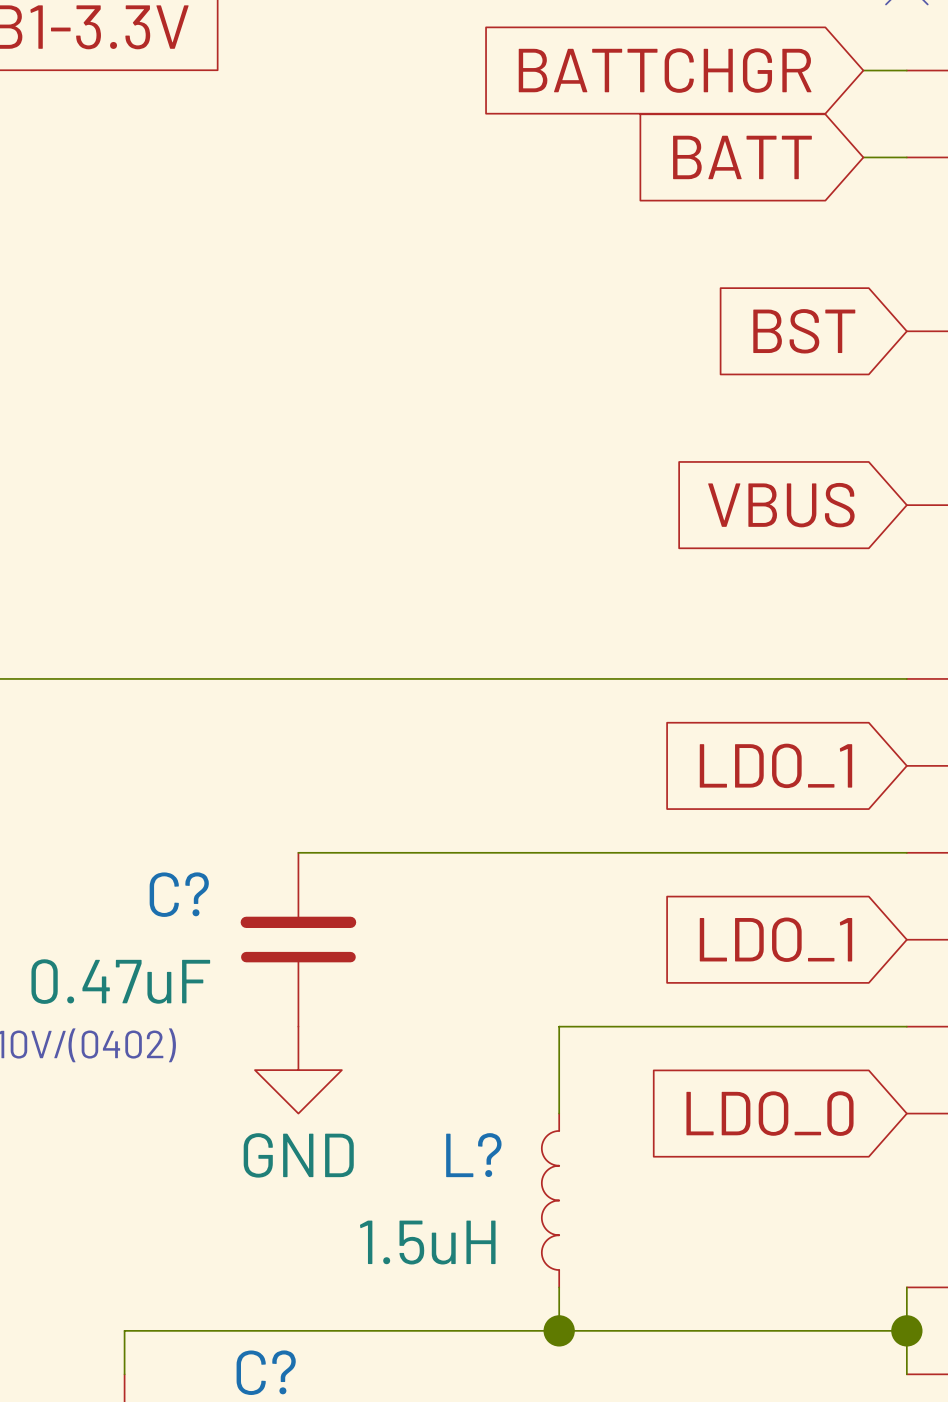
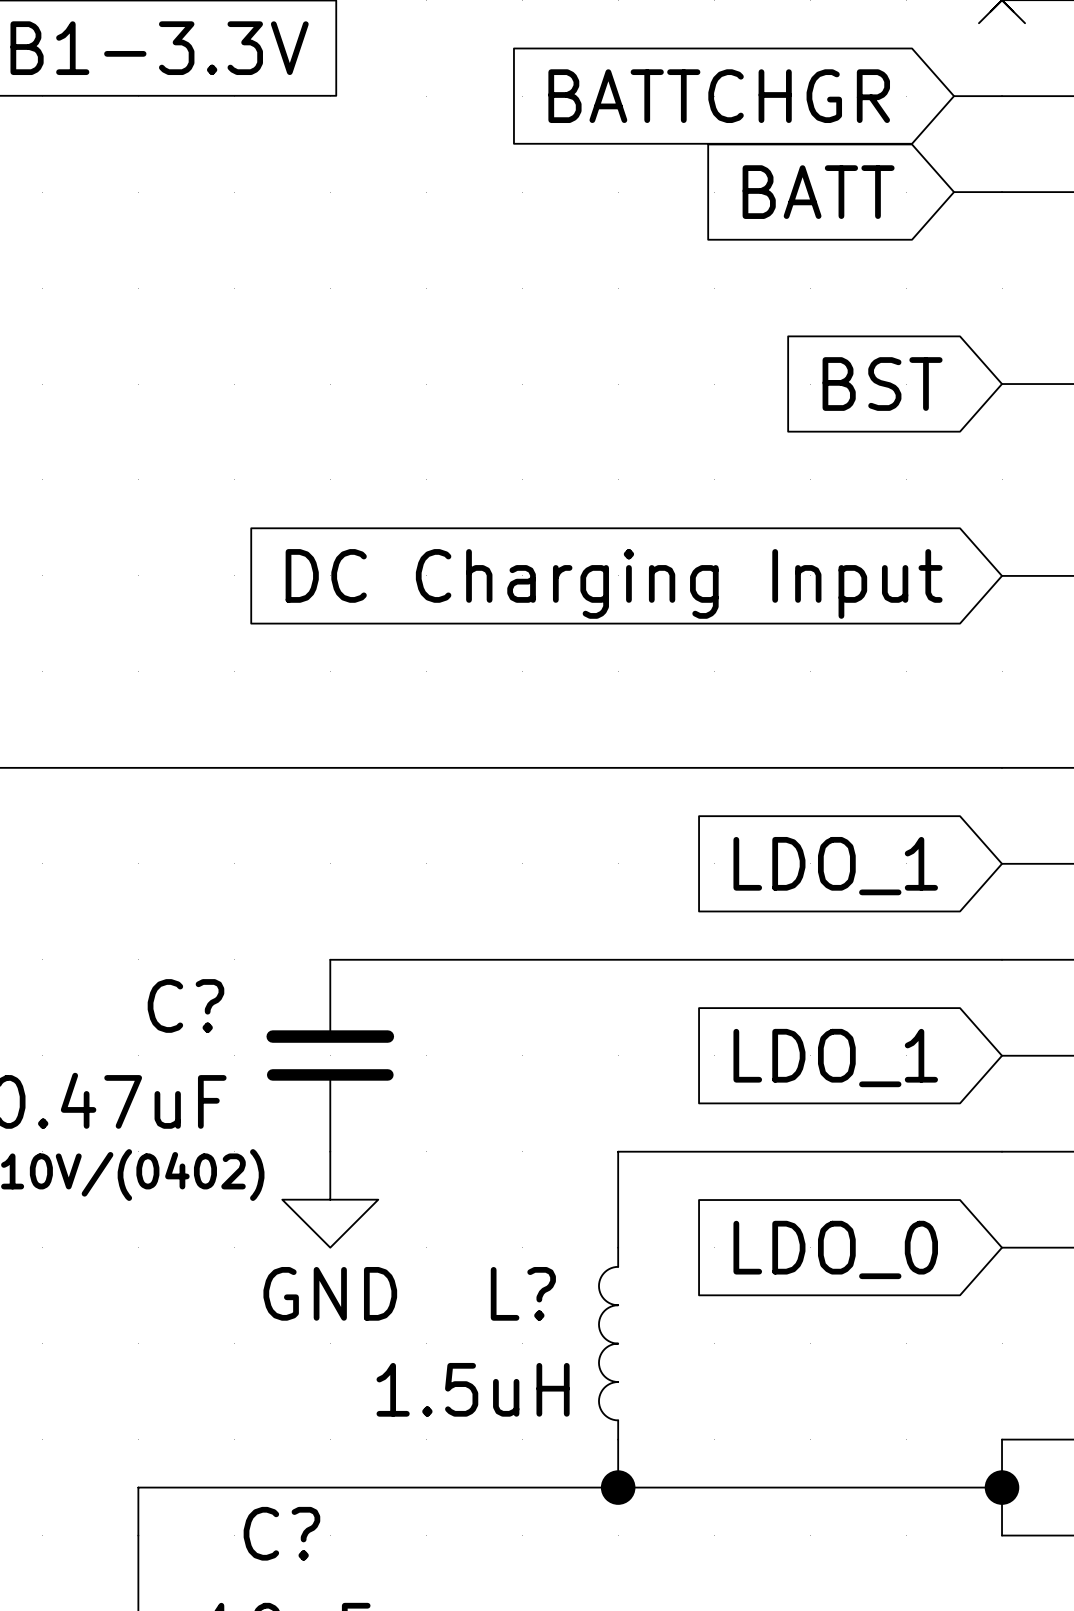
global label: VBUS (781, 505) -> DC Charging Input (614, 583)

